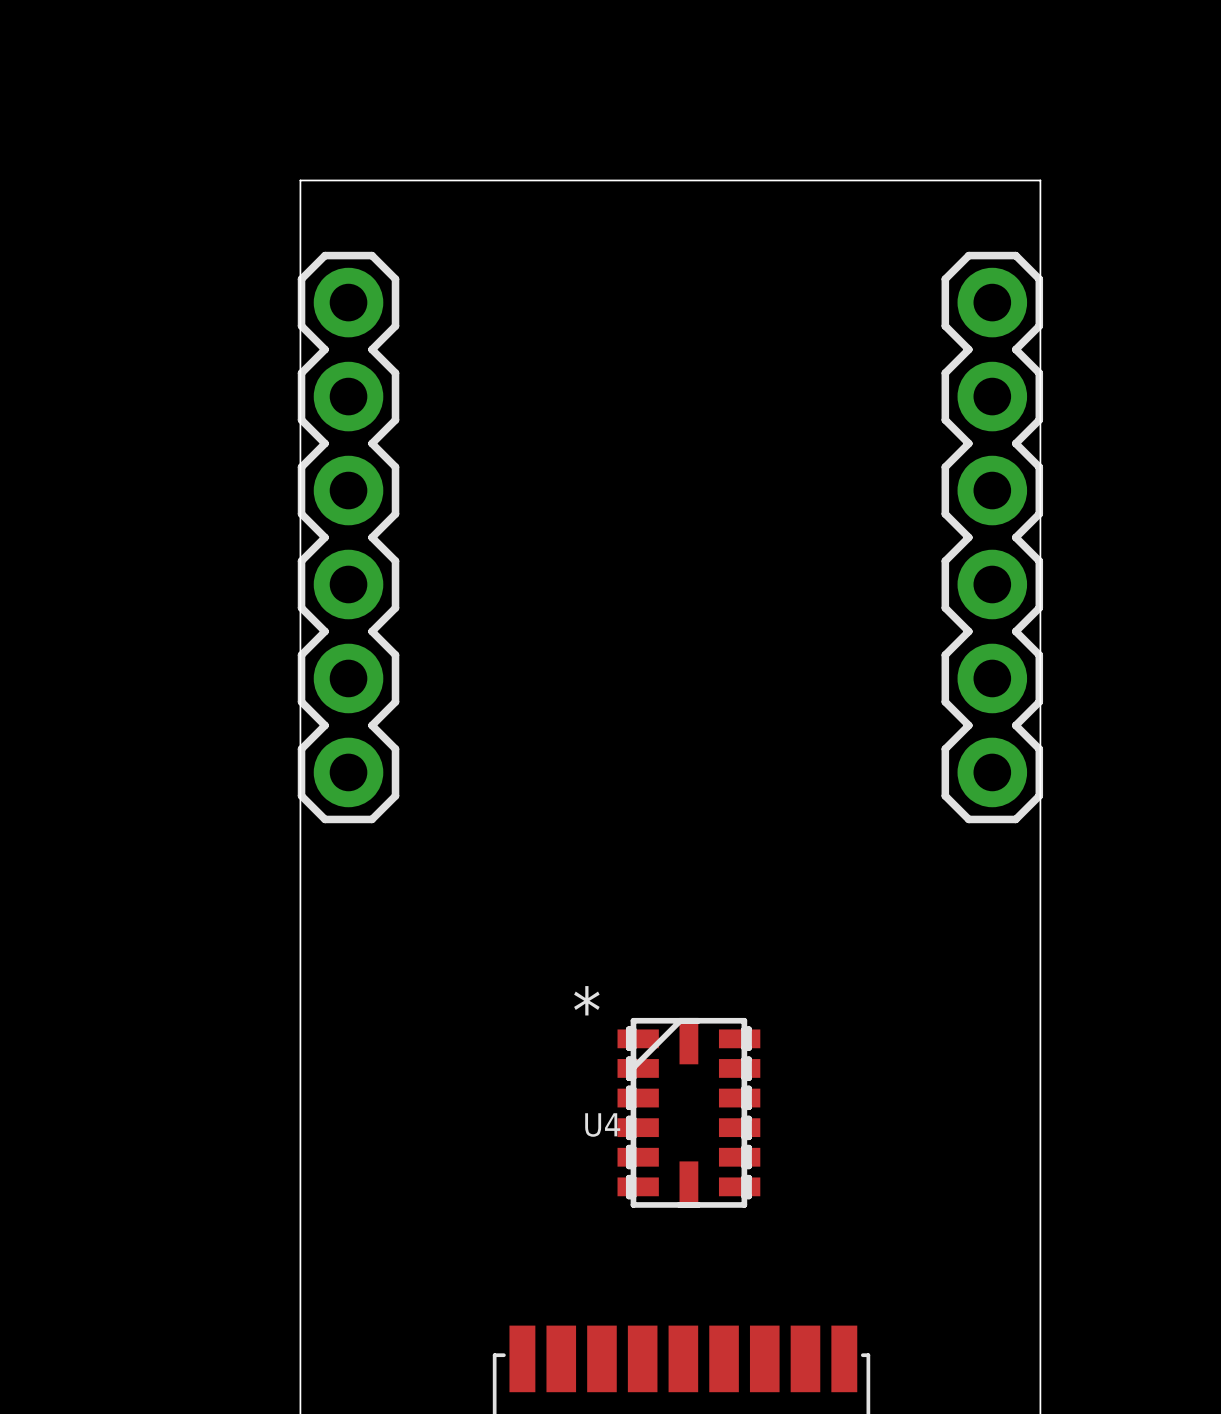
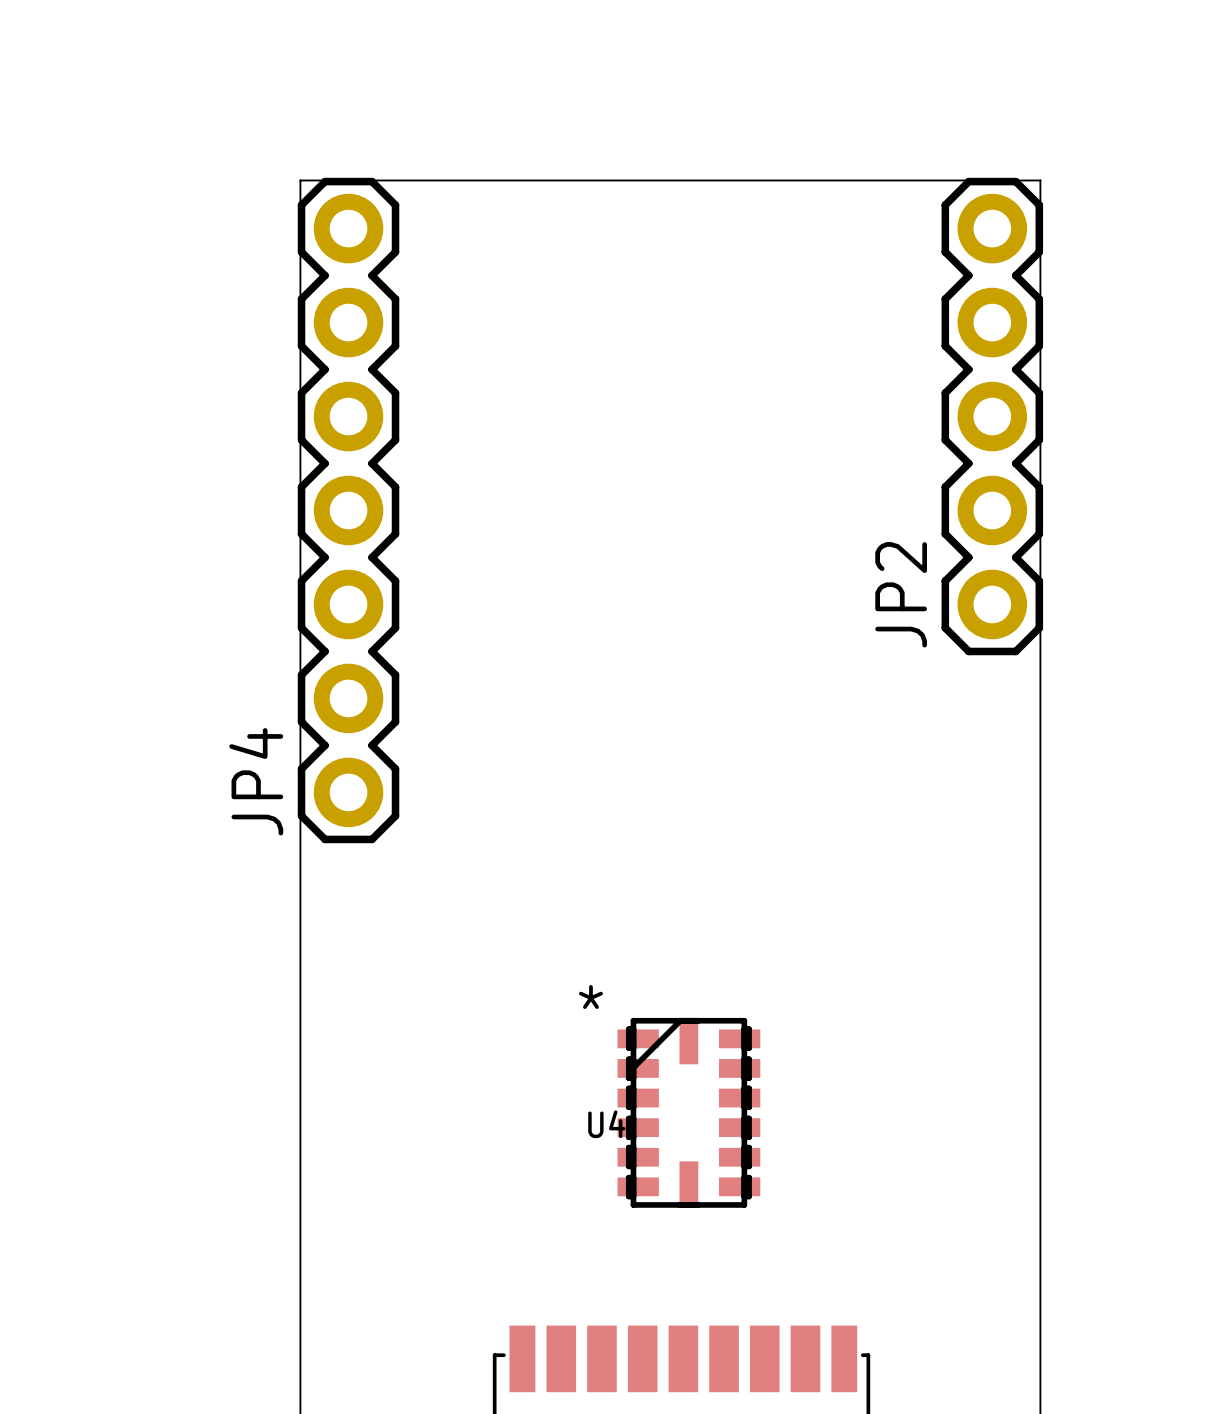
JP2: none -> (992, 416)
JP4: none -> (348, 510)
part: (348, 537) -> none
part: (992, 537) -> none

